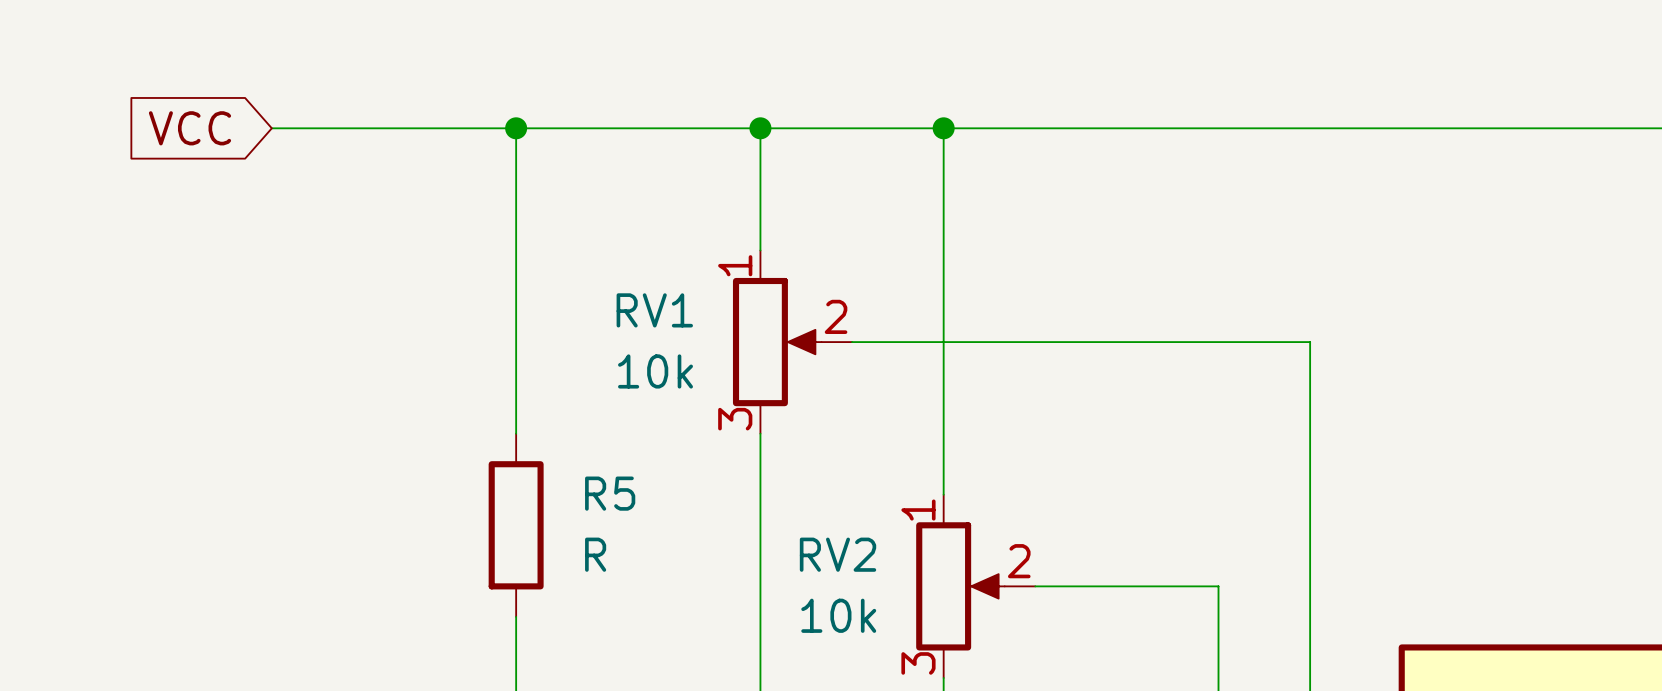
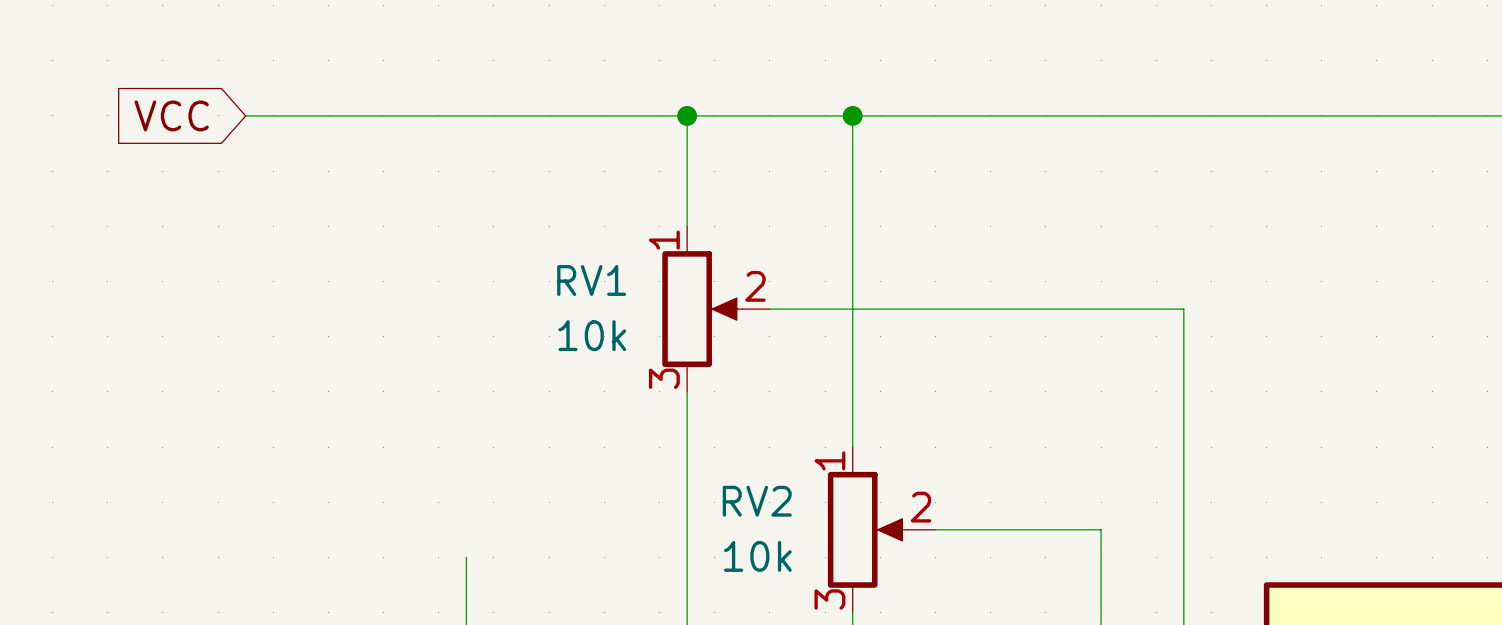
wire: (516, 128) (516, 433) -> none
junction: (516, 128) -> none
R5: R (516, 525) -> none

